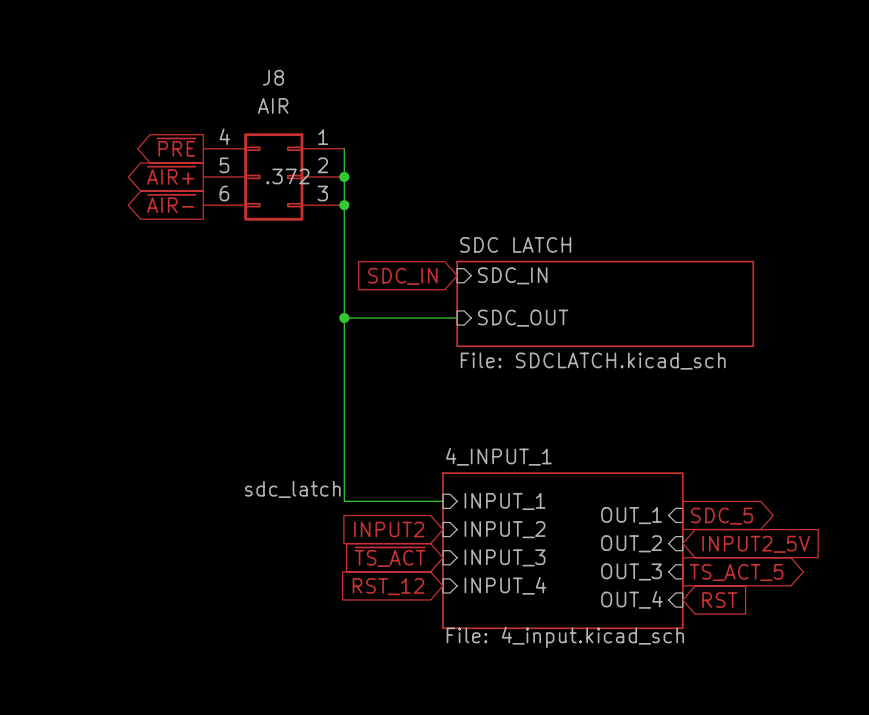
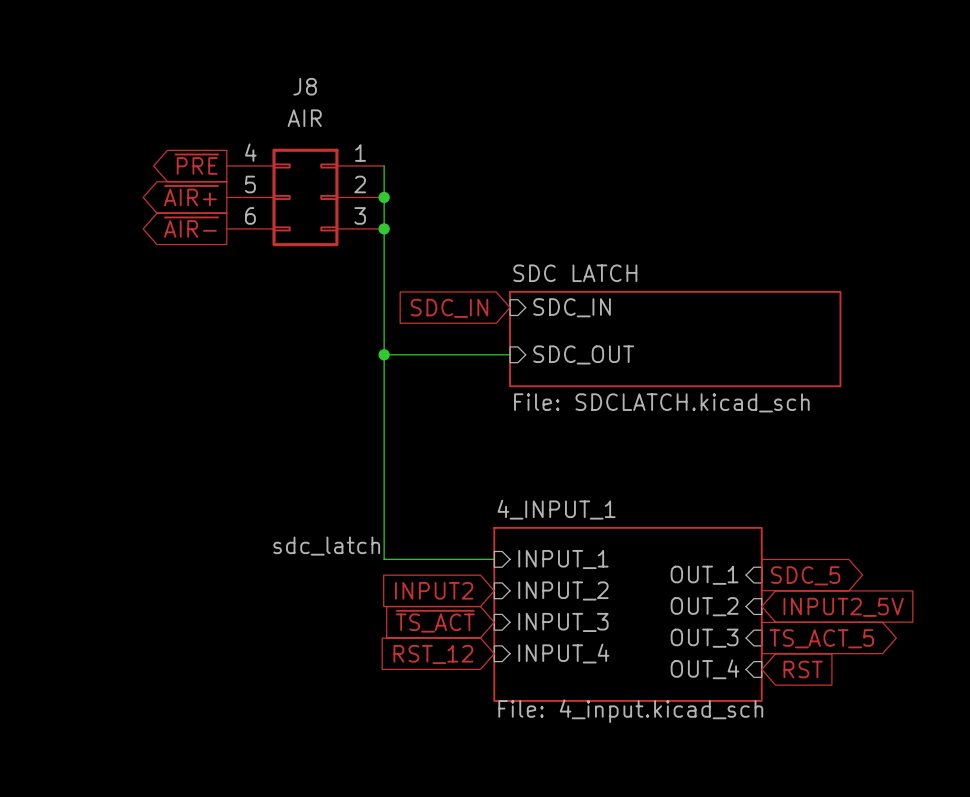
J8 text: .372 (287, 176) -> none

